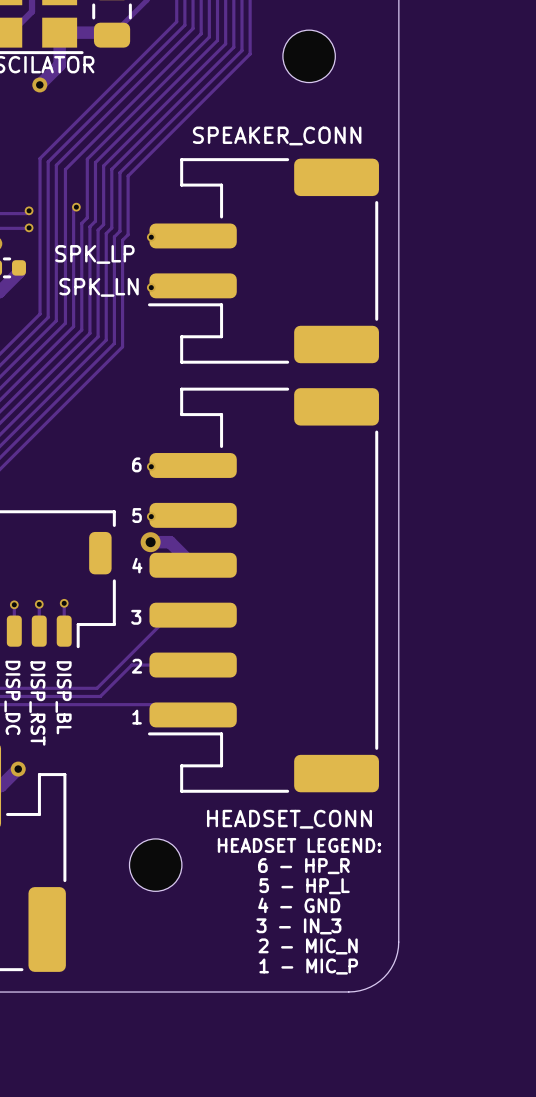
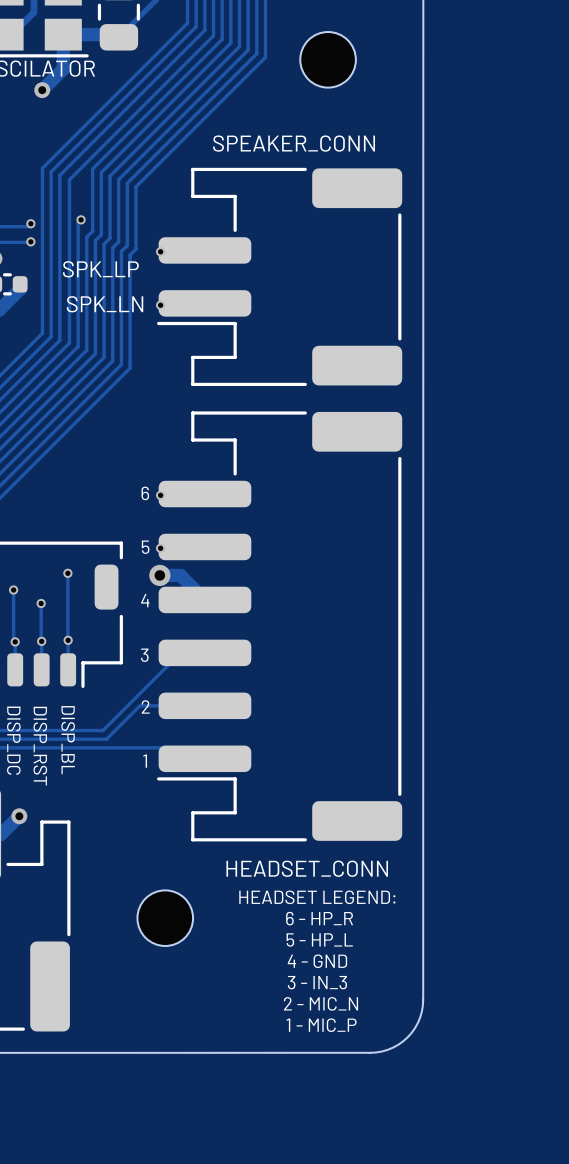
track: none -> (67, 573) (67, 640)
via: none -> (67, 573)
track: none -> (13, 590) (13, 640) (15, 641)
via: none -> (13, 590)
track: none -> (41, 603) (41, 641)
via: none -> (41, 603)

